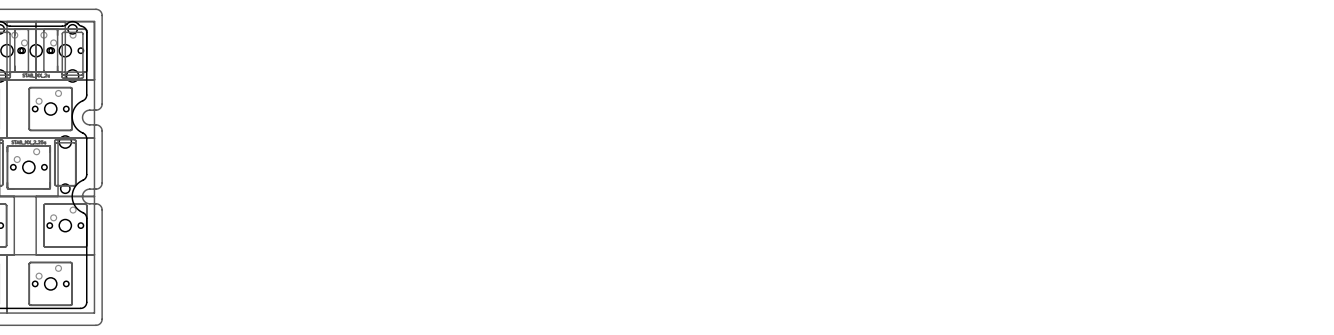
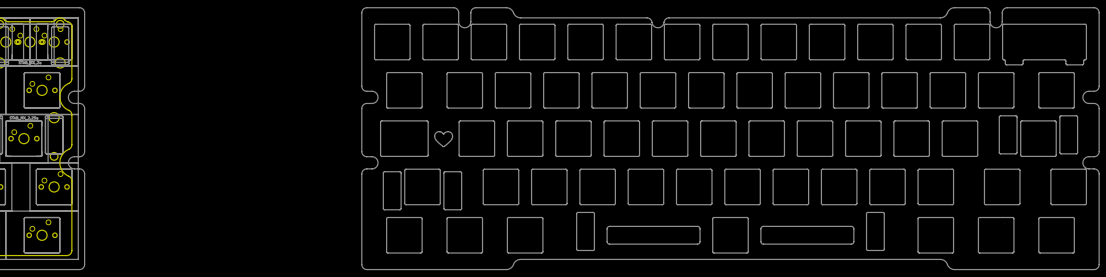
line: none -> (366, 7) (454, 7) (458, 11) (459, 24) (464, 27) (470, 24) (471, 10) (475, 7) (508, 7) (516, 16) (520, 17) (647, 17) (653, 26) (658, 27) (662, 26) (665, 19) (669, 17) (941, 17) (945, 15) (950, 9) (954, 7) (987, 8) (989, 11) (990, 24) (996, 27) (1001, 24) (1002, 11) (1006, 7) (1095, 8) (1099, 12) (1099, 86) (1095, 90) (1085, 92) (1082, 97) (1085, 102) (1095, 103) (1098, 106) (1099, 152) (1095, 156) (1085, 157) (1082, 162) (1085, 168) (1095, 169) (1099, 173) (1098, 266) (1094, 269) (954, 269) (940, 259) (520, 259) (516, 260) (511, 267) (507, 269) (364, 269) (361, 264) (361, 173) (364, 169) (375, 167) (378, 162) (375, 157) (364, 156) (361, 152) (361, 107) (364, 103) (375, 102) (378, 97) (375, 92) (364, 90) (361, 86) (361, 12) (366, 7)
line: none -> (375, 24) (409, 24) (409, 59) (374, 59) (375, 24)
line: none -> (424, 24) (457, 24) (457, 59) (423, 59) (424, 24)
line: none -> (472, 24) (506, 24) (506, 59) (471, 59) (472, 24)
line: none -> (520, 24) (554, 24) (554, 59) (519, 59) (520, 24)
line: none -> (569, 24) (602, 24) (602, 59) (568, 59) (569, 24)
line: none -> (617, 24) (651, 24) (651, 59) (616, 59) (617, 24)
line: none -> (665, 24) (699, 24) (699, 59) (664, 59) (665, 24)
line: none -> (713, 24) (747, 24) (747, 59) (713, 59) (713, 24)
line: none -> (762, 24) (796, 24) (796, 59) (761, 59) (762, 24)
line: none -> (810, 24) (844, 24) (844, 59) (809, 59) (810, 24)
line: none -> (858, 24) (892, 24) (892, 59) (858, 59) (858, 24)
line: none -> (907, 24) (941, 24) (941, 59) (906, 59) (907, 24)
line: none -> (955, 24) (989, 24) (989, 59) (954, 59) (955, 24)
line: none -> (1003, 24) (1085, 24) (1086, 59) (1082, 64) (1066, 64) (1064, 59) (1024, 59) (1022, 64) (1006, 64) (1002, 58) (1003, 24)
line: none -> (387, 72) (421, 72) (421, 107) (386, 107) (387, 72)
line: none -> (448, 72) (482, 72) (482, 107) (447, 107) (448, 72)
line: none -> (496, 72) (530, 72) (530, 107) (495, 107) (496, 72)
line: none -> (544, 72) (578, 72) (578, 107) (544, 107) (544, 72)
line: none -> (593, 72) (627, 72) (627, 107) (592, 107) (593, 72)
line: none -> (641, 72) (675, 72) (675, 107) (640, 107) (641, 72)
line: none -> (689, 72) (723, 72) (723, 107) (688, 107) (689, 72)
line: none -> (738, 72) (772, 72) (772, 107) (737, 107) (738, 72)
line: none -> (786, 72) (820, 72) (820, 107) (785, 107) (786, 72)
line: none -> (834, 72) (868, 72) (868, 107) (833, 107) (834, 72)
line: none -> (883, 72) (916, 72) (916, 107) (882, 107) (883, 72)
line: none -> (931, 72) (965, 72) (965, 107) (930, 107) (931, 72)
line: none -> (979, 72) (1013, 72) (1013, 107) (978, 107) (979, 72)
line: none -> (1040, 72) (1073, 72) (1073, 107) (1039, 107) (1040, 72)
line: none -> (1000, 115) (1016, 116) (1016, 153) (999, 153) (1000, 115)
line: none -> (1061, 115) (1077, 116) (1076, 153) (1059, 153) (1061, 115)
line: none -> (381, 120) (427, 121) (427, 155) (381, 156) (381, 120)
line: none -> (460, 120) (494, 121) (494, 156) (459, 156) (460, 120)
line: none -> (508, 120) (542, 121) (542, 156) (507, 156) (508, 120)
line: none -> (556, 120) (590, 121) (590, 156) (556, 156) (556, 120)
line: none -> (605, 120) (639, 121) (639, 156) (604, 156) (605, 120)
line: none -> (653, 120) (687, 121) (687, 156) (652, 156) (653, 120)
line: none -> (701, 120) (735, 121) (735, 156) (701, 156) (701, 120)
line: none -> (750, 120) (784, 121) (784, 156) (749, 156) (750, 120)
line: none -> (798, 120) (832, 121) (832, 156) (797, 156) (798, 120)
line: none -> (846, 120) (880, 121) (880, 156) (845, 156) (846, 120)
line: none -> (895, 120) (929, 121) (929, 156) (894, 156) (895, 120)
line: none -> (943, 120) (977, 121) (977, 156) (942, 156) (943, 120)
line: none -> (1021, 120) (1055, 121) (1055, 156) (1021, 156) (1021, 120)
line: none -> (439, 131) (435, 133) (434, 138) (444, 146) (451, 140) (452, 134) (448, 131) (443, 134) (439, 131)
line: none -> (406, 169) (439, 169) (439, 204) (405, 204) (406, 169)
line: none -> (484, 169) (518, 169) (518, 204) (483, 204) (484, 169)
line: none -> (532, 169) (566, 169) (566, 204) (531, 204) (532, 169)
line: none -> (581, 169) (615, 169) (615, 204) (580, 204) (581, 169)
line: none -> (629, 169) (663, 169) (663, 204) (628, 204) (629, 169)
line: none -> (677, 169) (711, 169) (711, 204) (676, 204) (677, 169)
line: none -> (726, 169) (759, 169) (759, 204) (725, 204) (726, 169)
line: none -> (774, 169) (808, 169) (808, 204) (773, 204) (774, 169)
line: none -> (822, 169) (856, 169) (856, 204) (821, 204) (822, 169)
line: none -> (871, 169) (904, 169) (904, 204) (870, 204) (871, 169)
line: none -> (919, 169) (953, 169) (953, 204) (918, 204) (919, 169)
line: none -> (985, 169) (1019, 169) (1019, 204) (984, 204) (985, 169)
line: none -> (1052, 169) (1086, 169) (1086, 204) (1051, 204) (1052, 169)
line: none -> (384, 171) (401, 172) (400, 209) (383, 208) (384, 171)
line: none -> (445, 171) (461, 172) (460, 209) (443, 208) (445, 171)
line: none -> (577, 212) (594, 213) (593, 250) (576, 249) (577, 212)
line: none -> (867, 212) (884, 213) (883, 250) (866, 249) (867, 212)
line: none -> (387, 217) (421, 217) (421, 252) (386, 252) (387, 217)
line: none -> (448, 217) (482, 217) (482, 252) (447, 252) (448, 217)
line: none -> (508, 217) (542, 217) (542, 252) (507, 252) (508, 217)
line: none -> (713, 217) (747, 217) (747, 252) (713, 252) (713, 217)
line: none -> (919, 217) (953, 217) (953, 252) (918, 252) (919, 217)
line: none -> (979, 217) (1013, 217) (1013, 252) (978, 252) (979, 217)
line: none -> (1040, 217) (1073, 217) (1073, 252) (1039, 252) (1040, 217)
line: none -> (609, 226) (698, 226) (700, 228) (699, 242) (697, 244) (609, 244) (607, 241) (607, 228) (609, 226)
line: none -> (763, 226) (851, 226) (853, 228) (853, 242) (851, 244) (763, 244) (760, 241) (760, 228) (763, 226)

